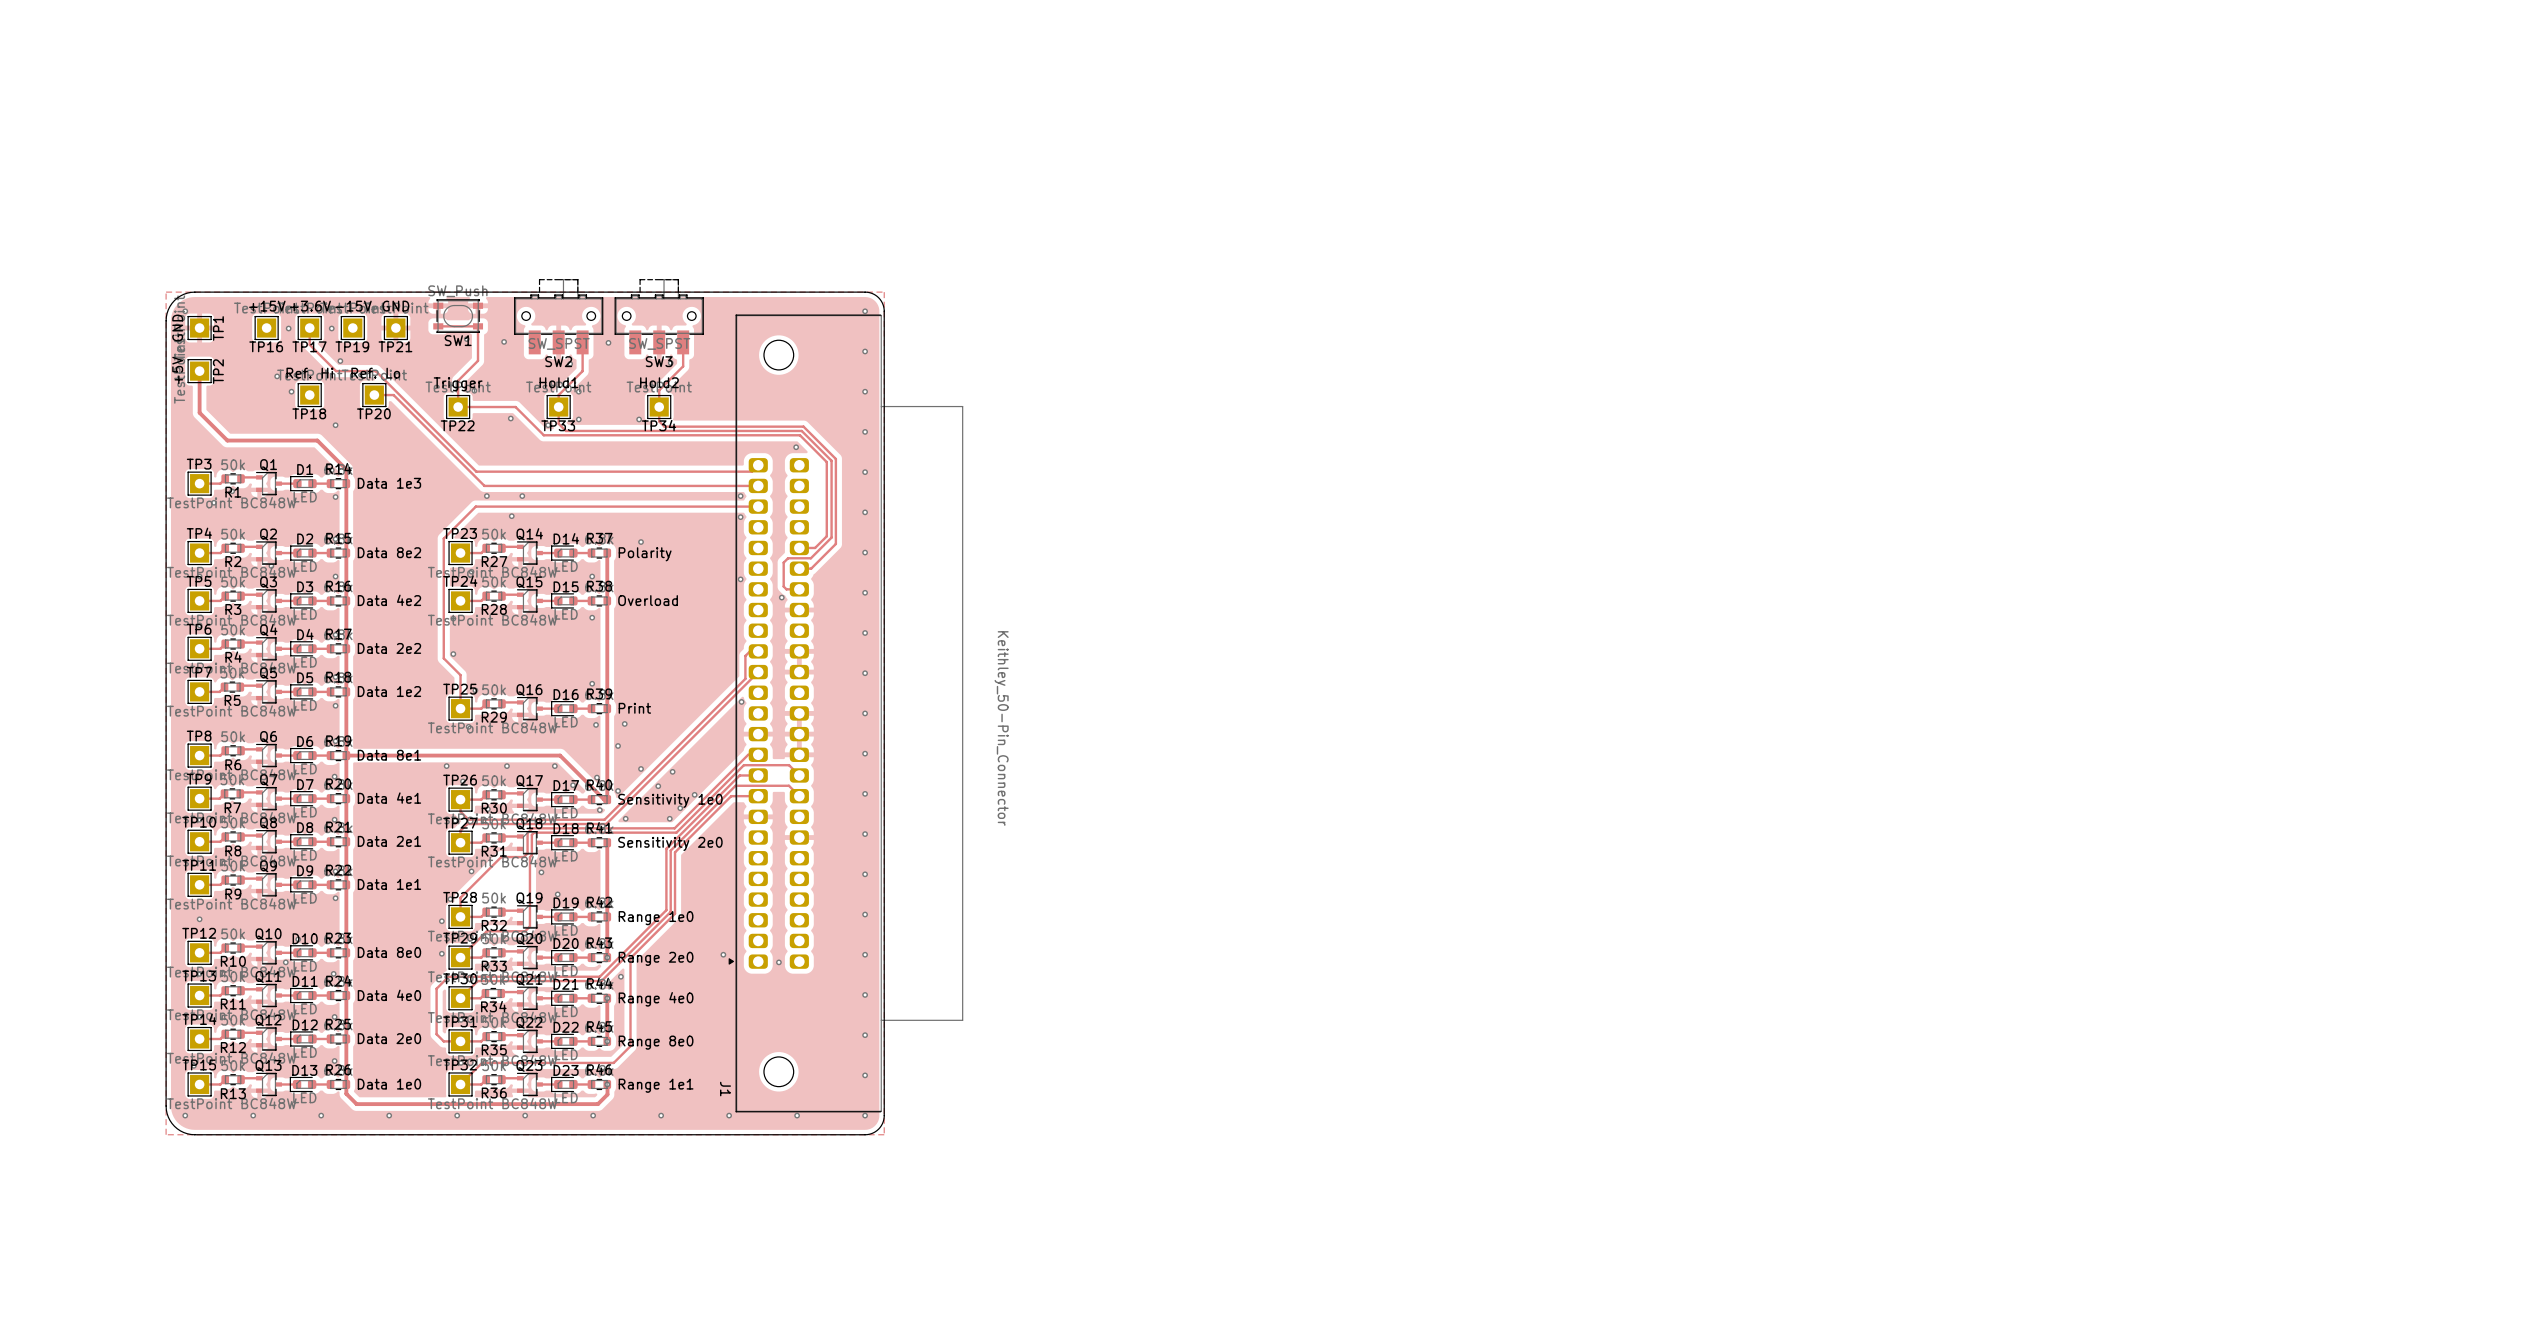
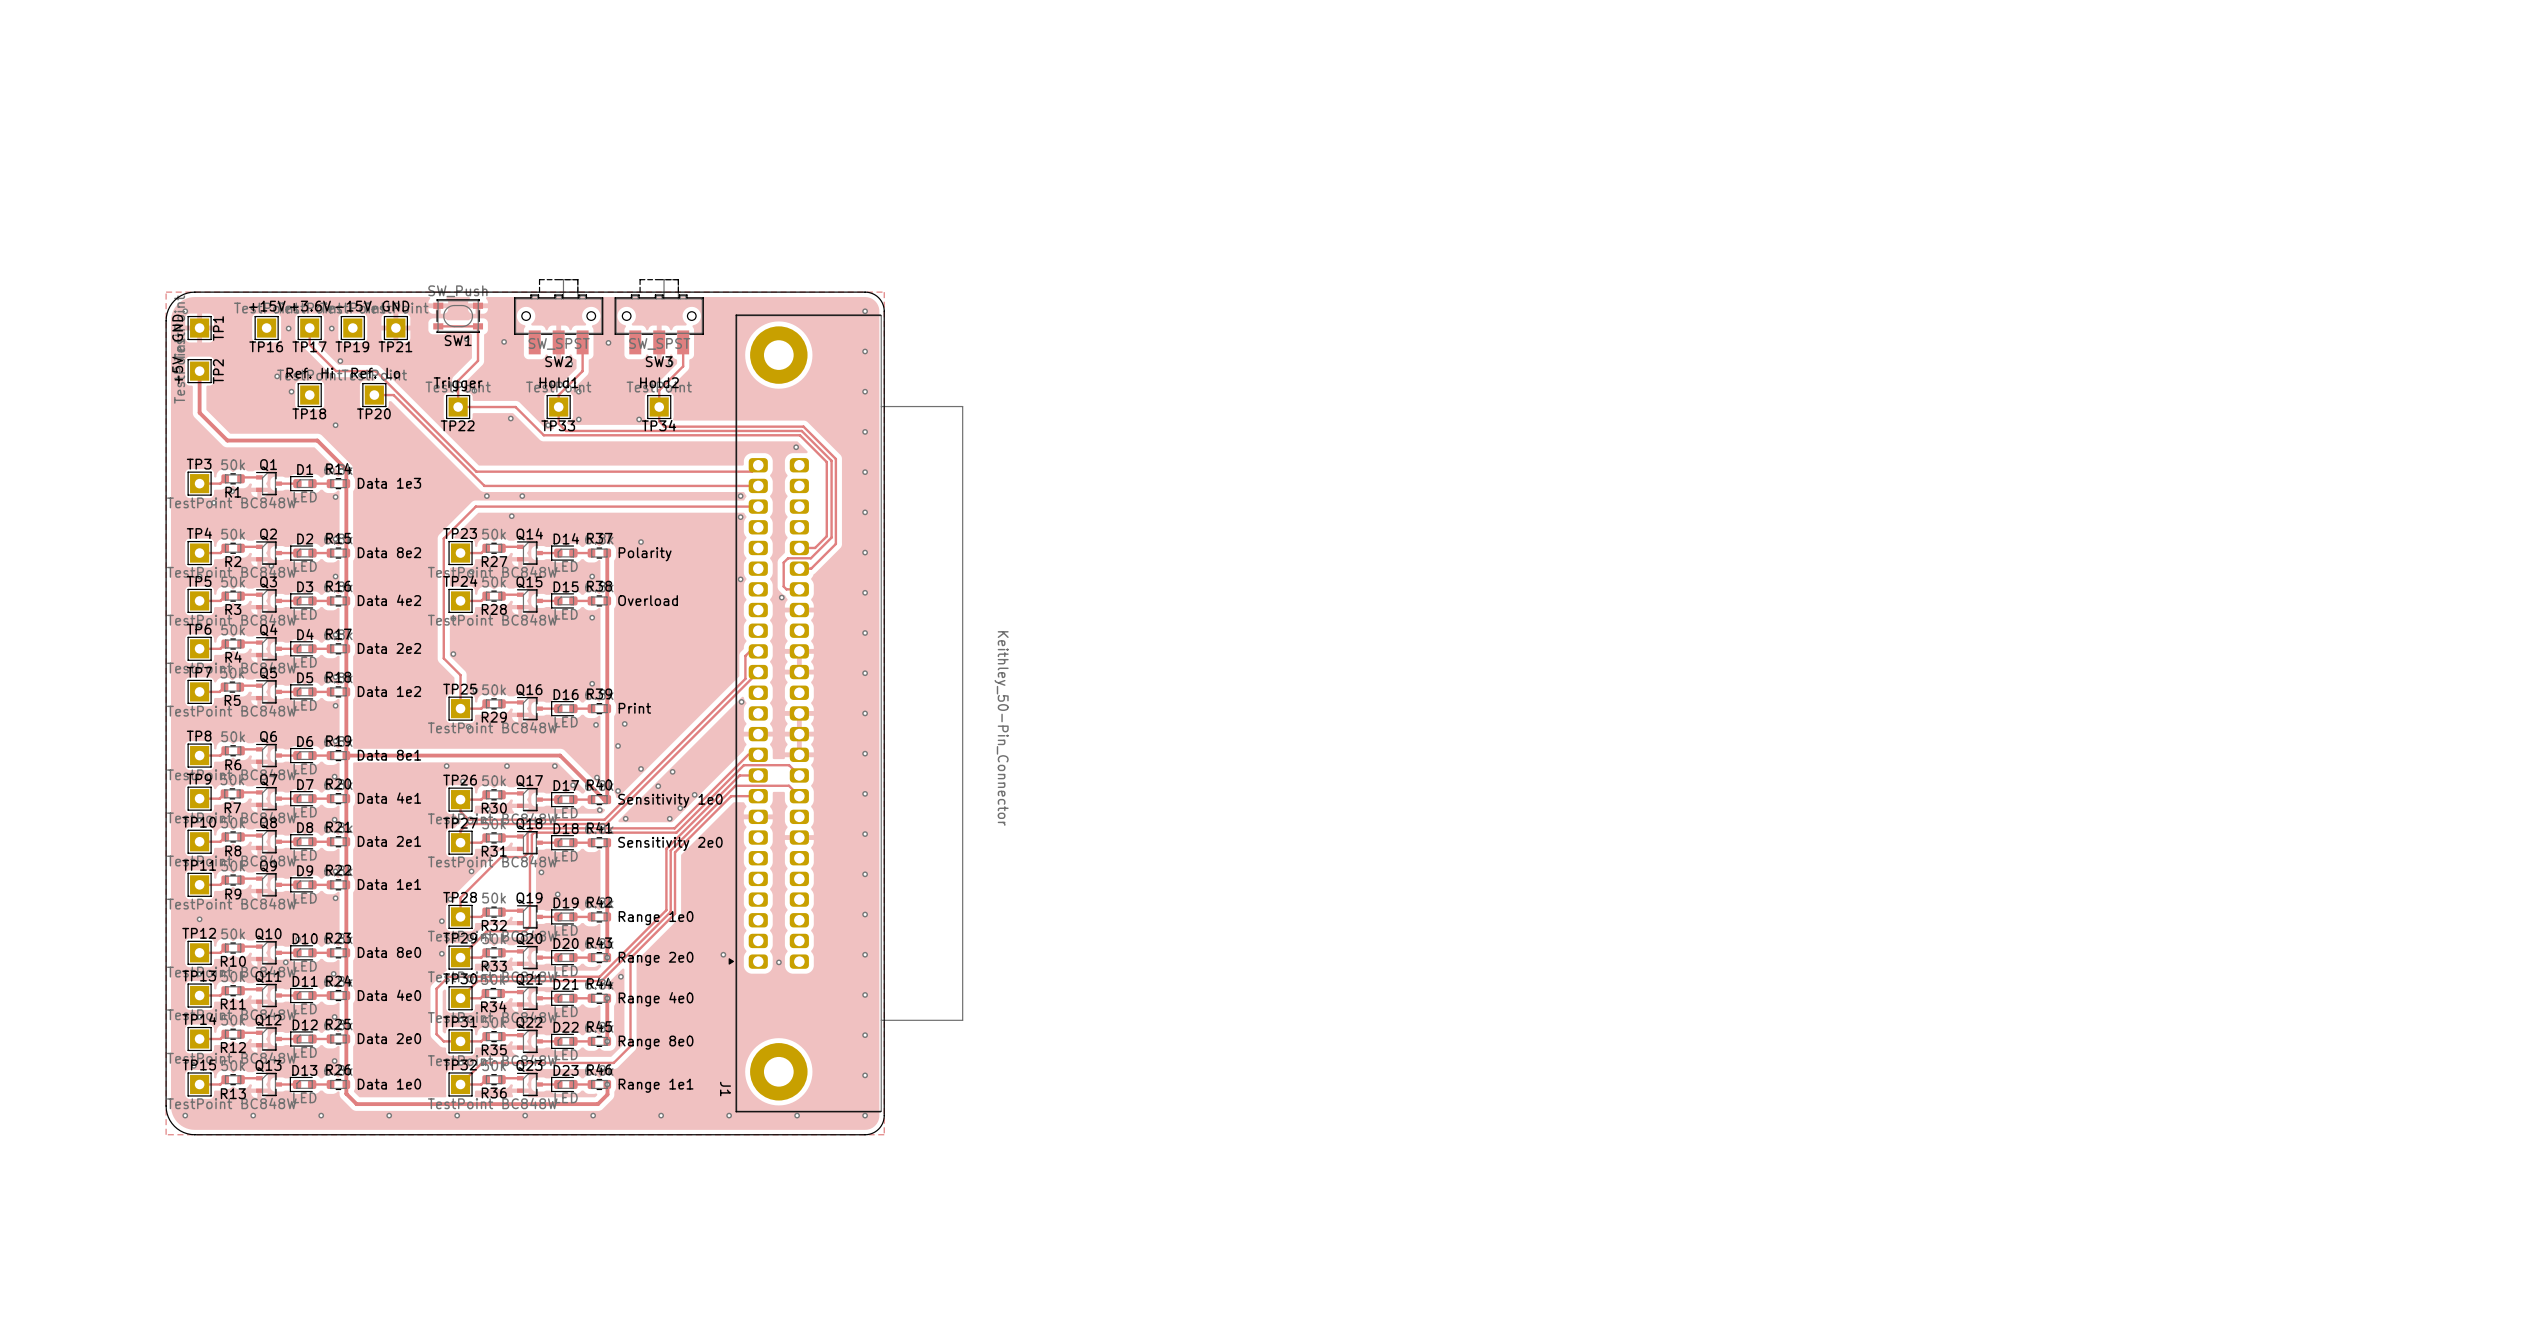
J1 footprint: [728, 314, 964, 1113] -> [728, 314, 964, 1113]

